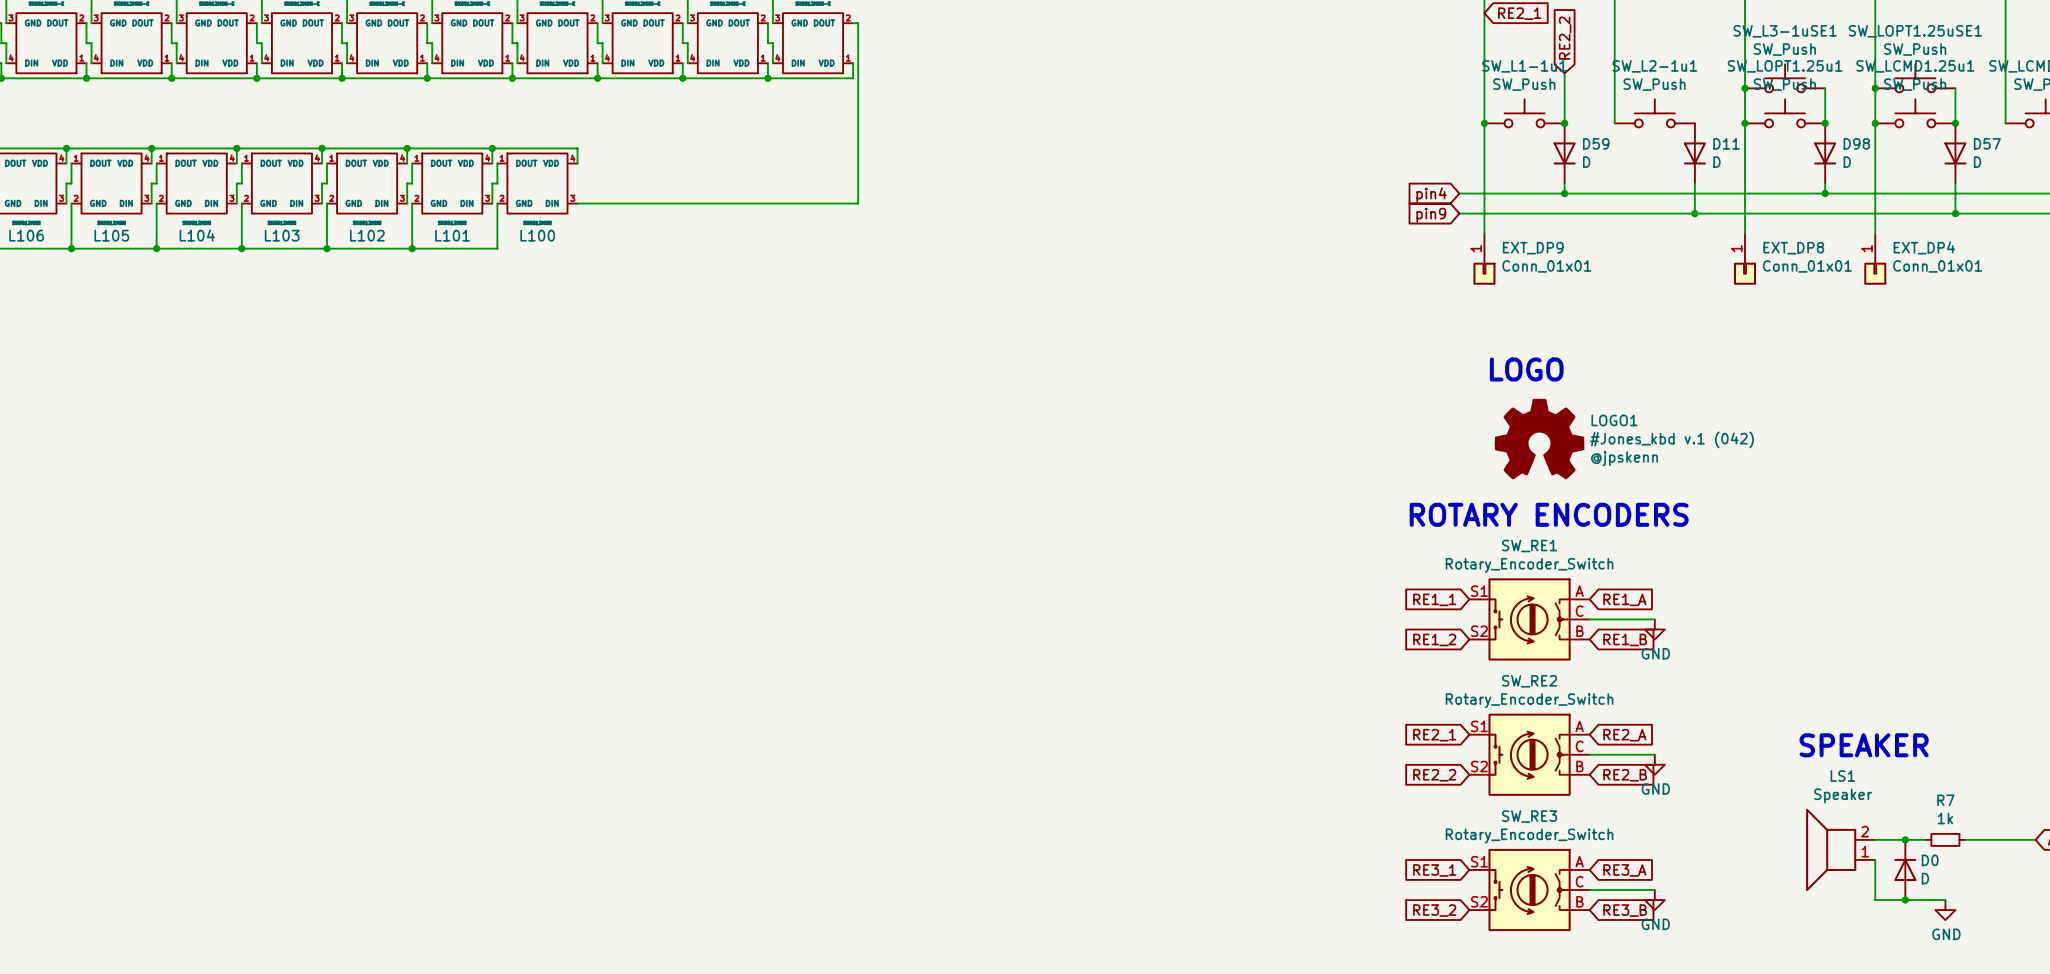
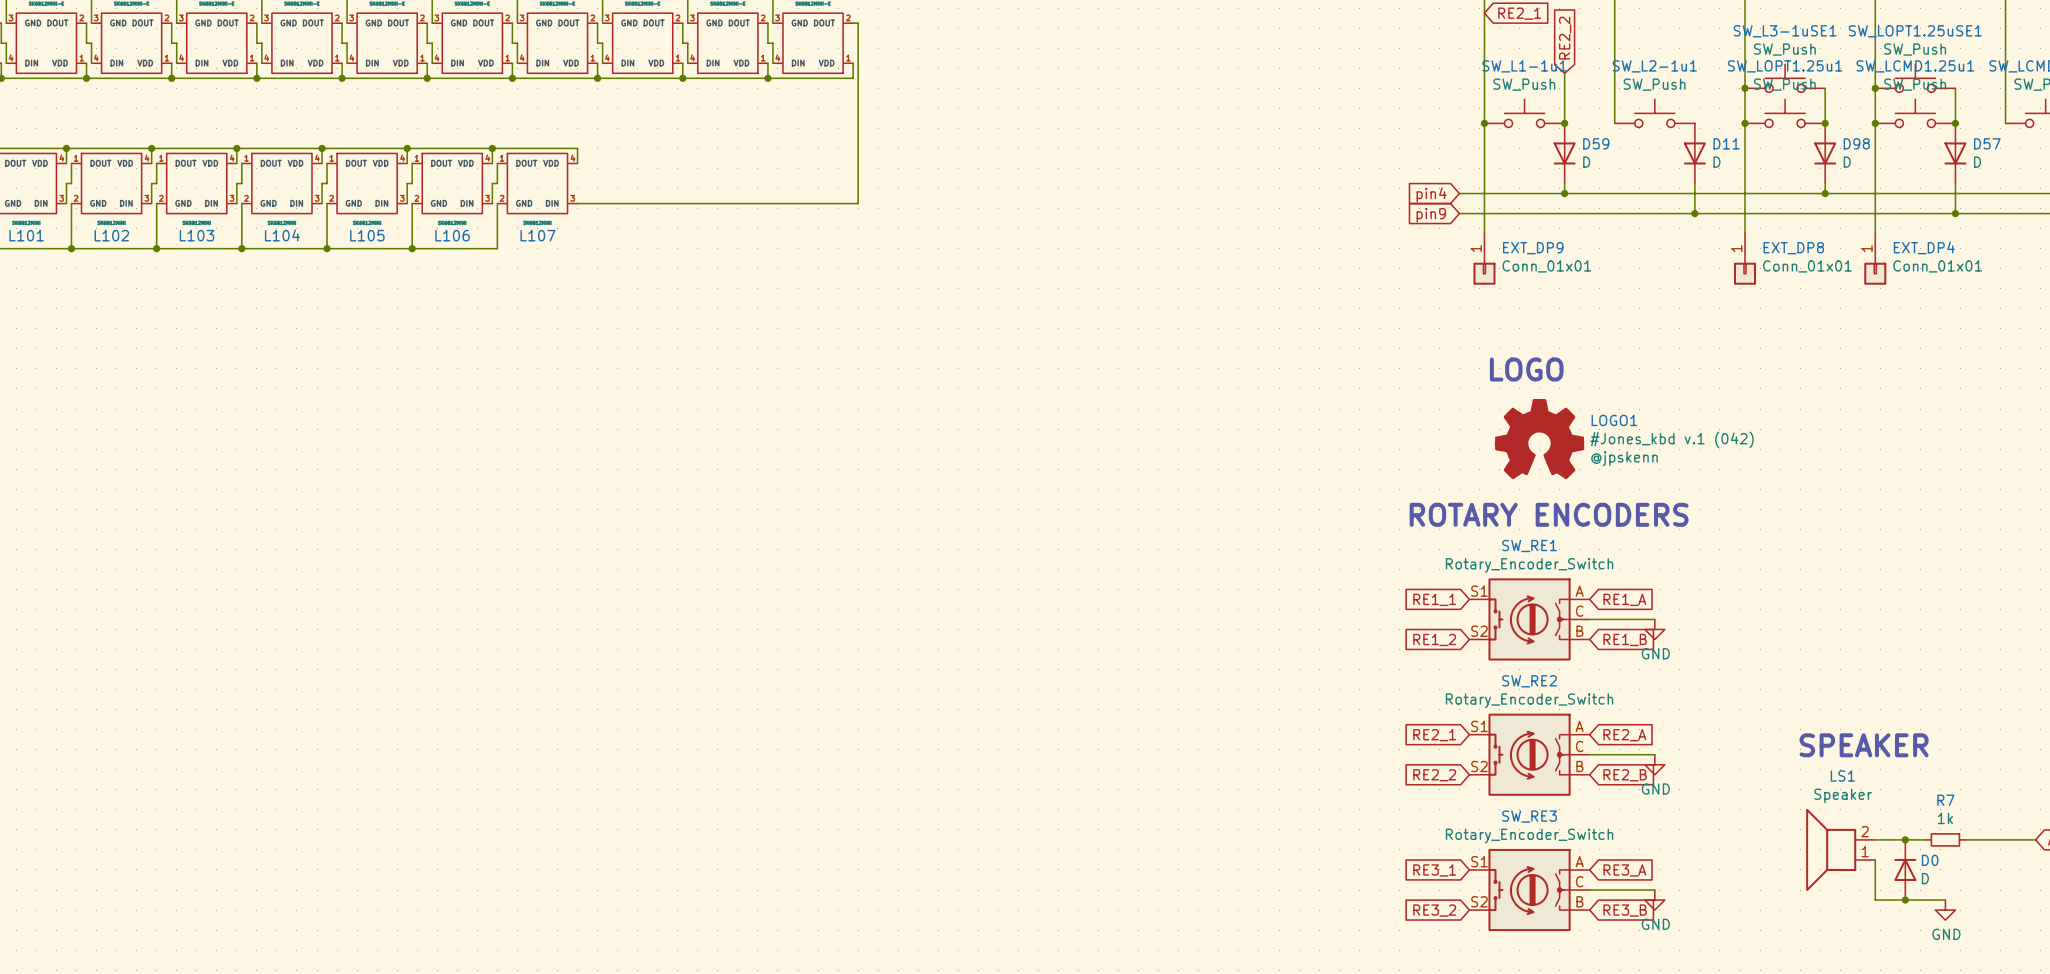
L106 name: L106 (26, 235) -> L101 (26, 235)
L105 name: L105 (111, 235) -> L102 (111, 235)
L104 name: L104 (197, 235) -> L103 (196, 235)
L103 name: L103 (282, 235) -> L104 (282, 235)
L102 name: L102 (367, 235) -> L105 (367, 235)
L101 name: L101 (452, 235) -> L106 (452, 235)
L100 name: L100 (537, 235) -> L107 (537, 235)

